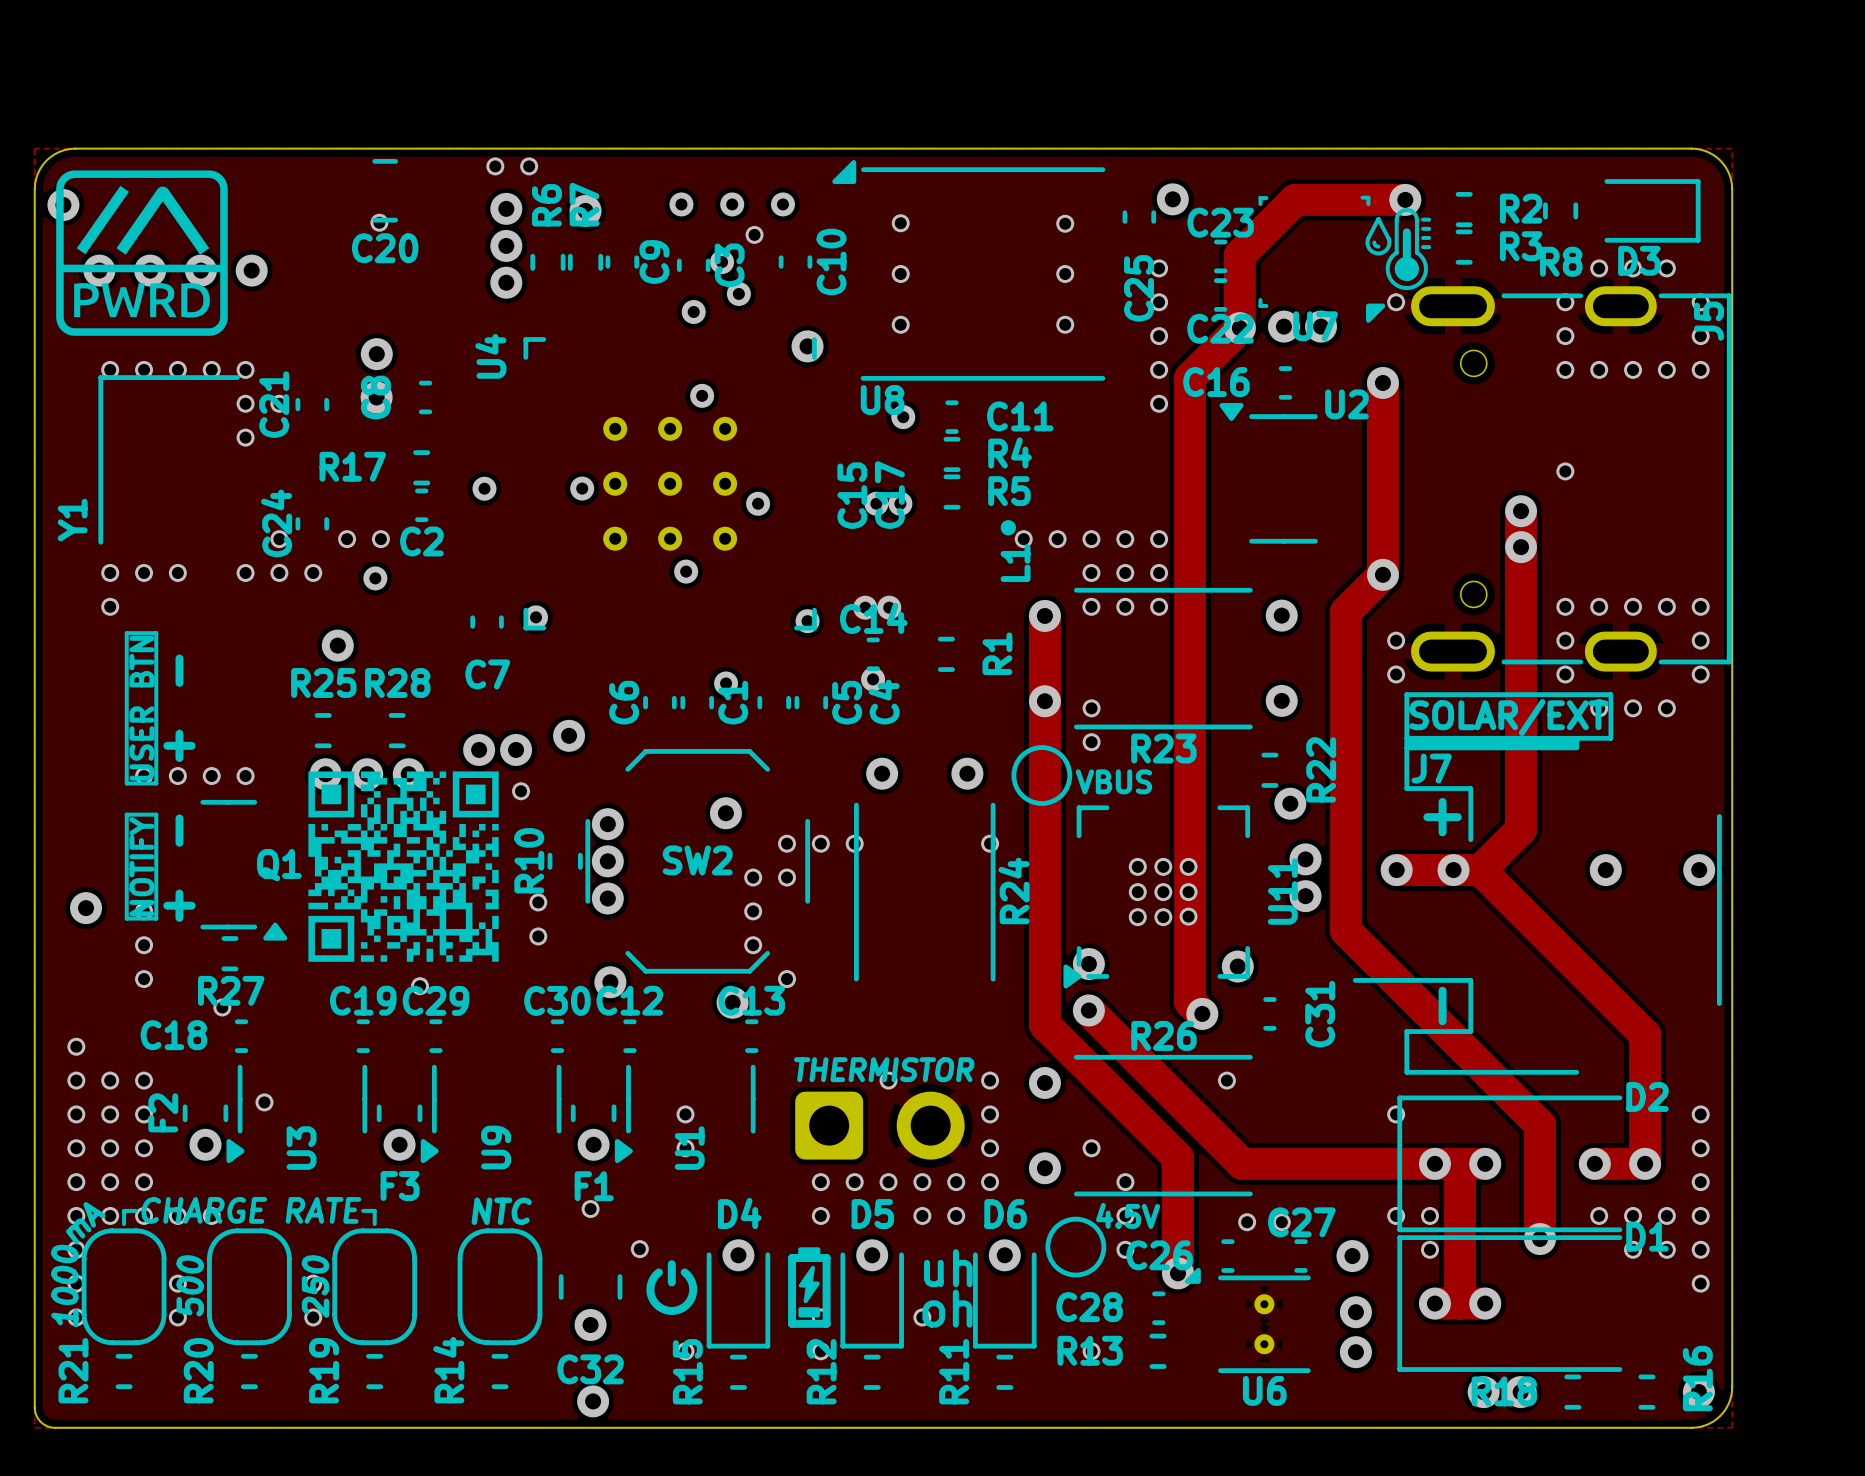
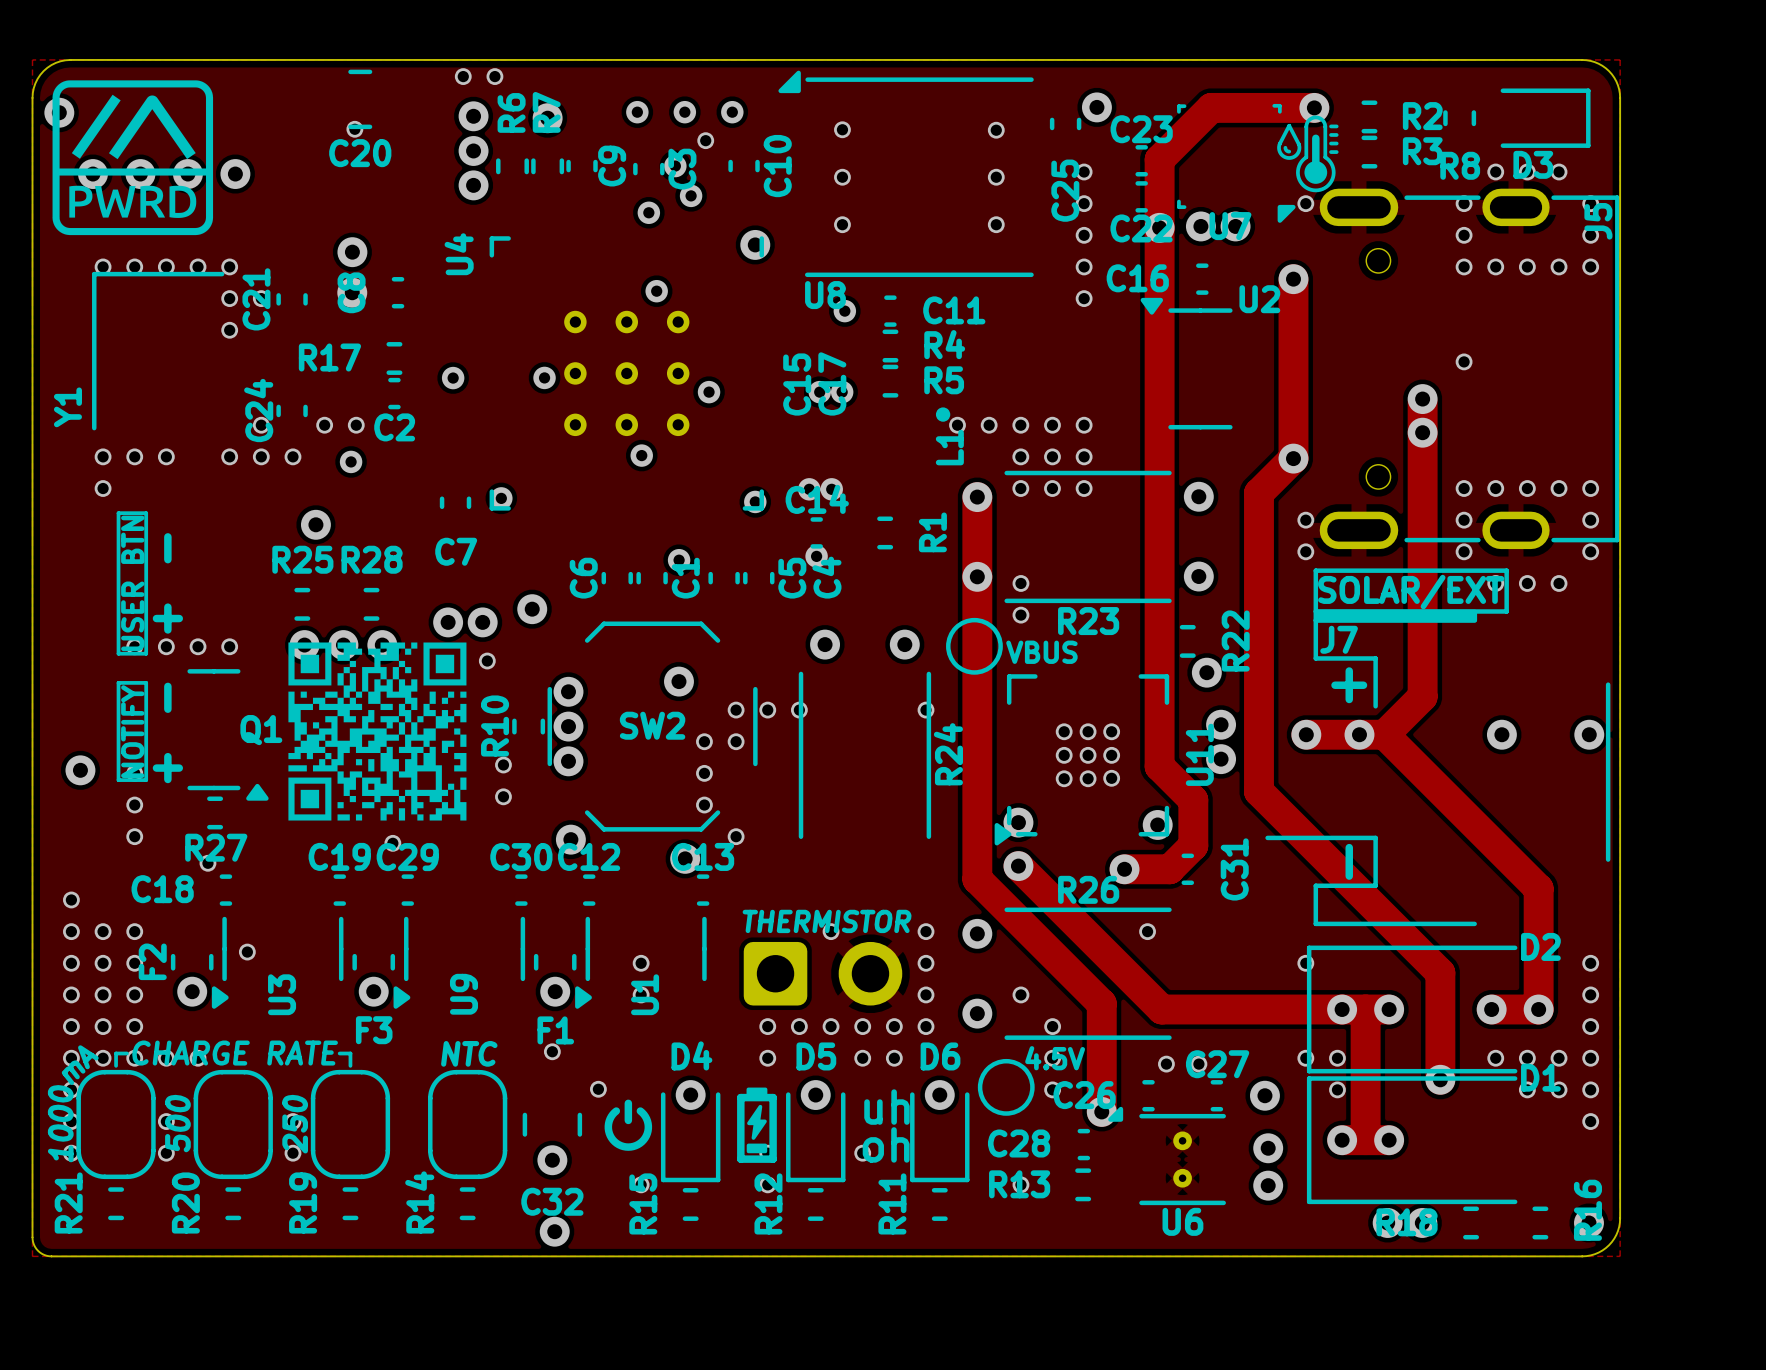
track: (1239, 328) (1190, 377) (1190, 1001) (1202, 1013) -> (1159, 227) (1159, 766) (1193, 800) (1193, 845) (1169, 869) (1124, 869)

